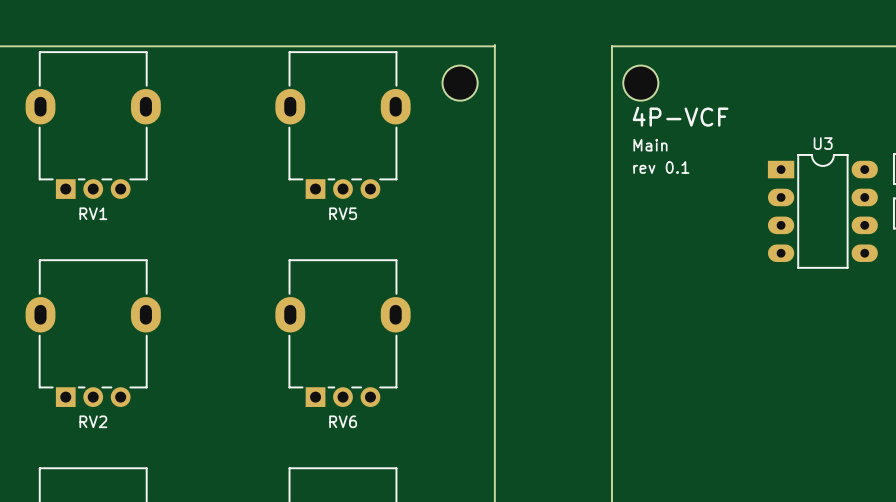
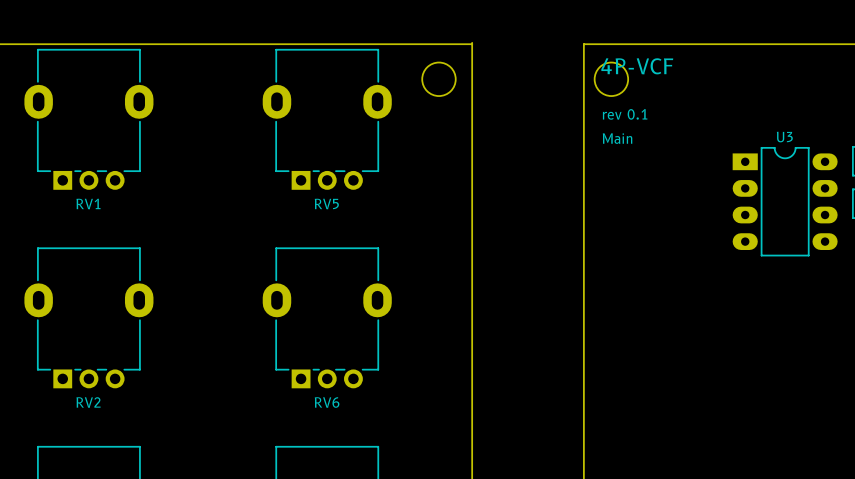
text position: 4P-VCF (680, 116) -> 4P-VCF (637, 66)
text position: rev 0.1 (661, 167) -> rev 0.1 (625, 114)

